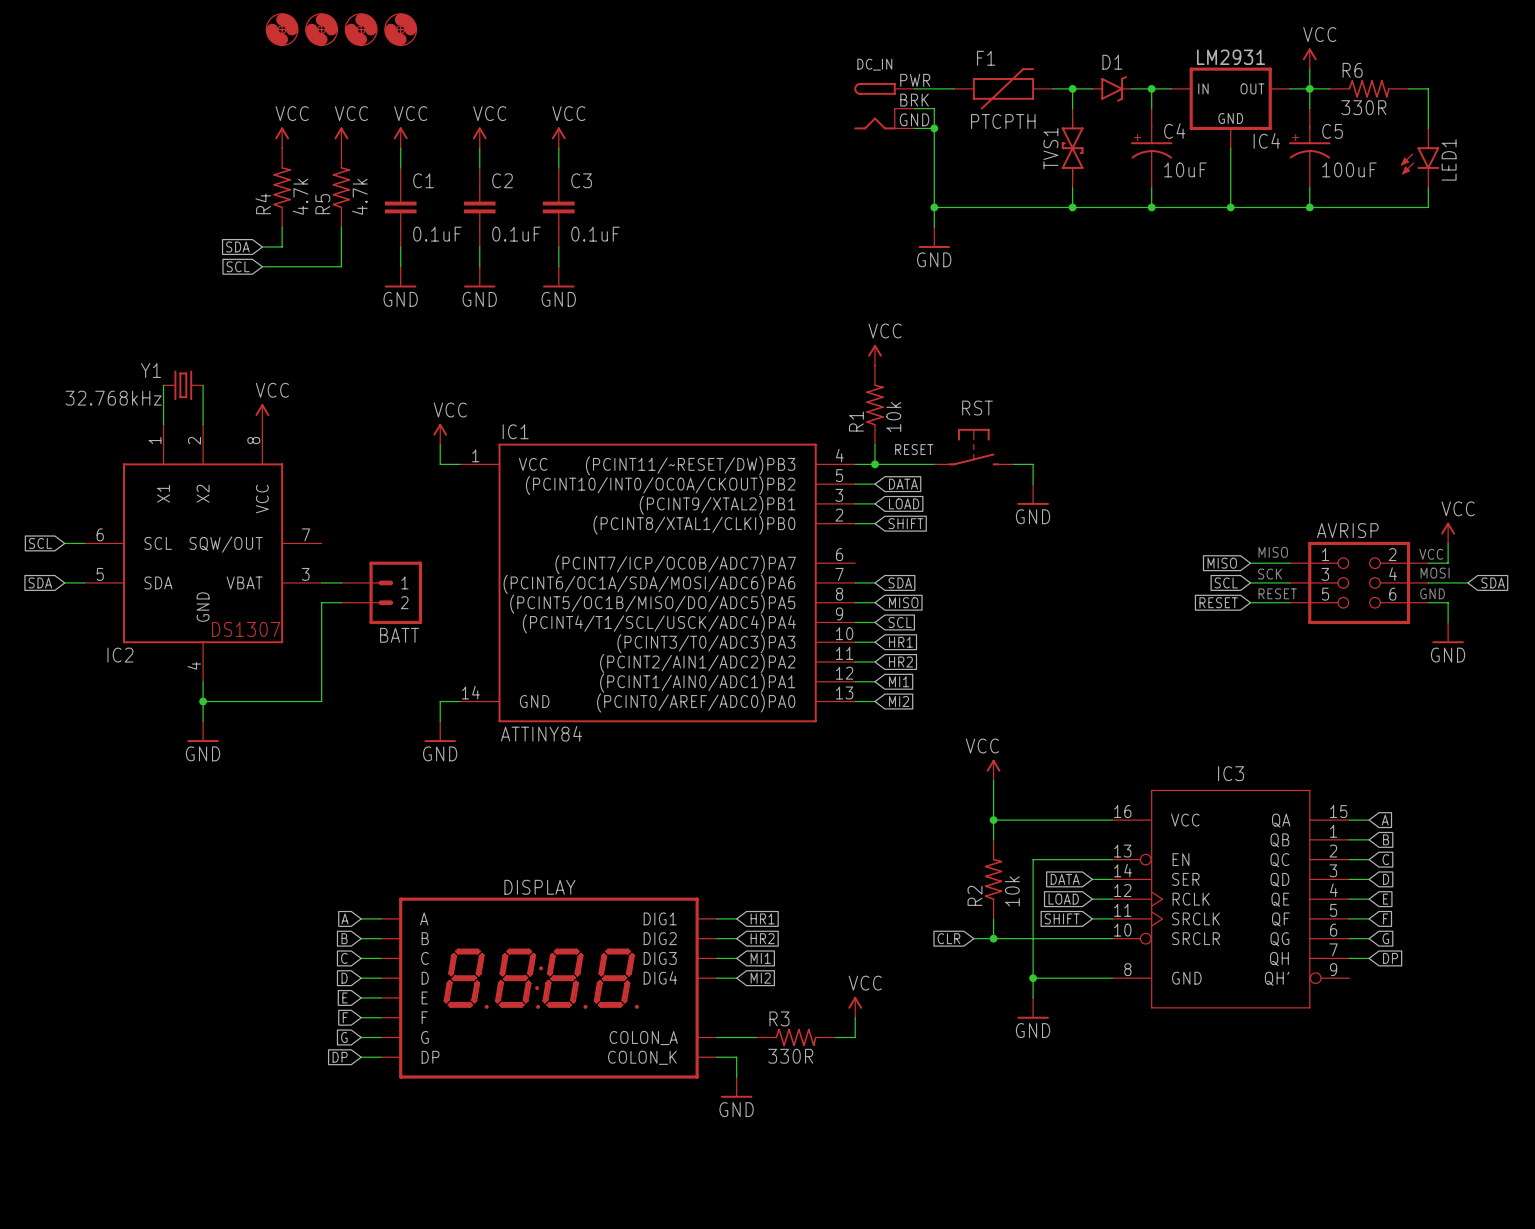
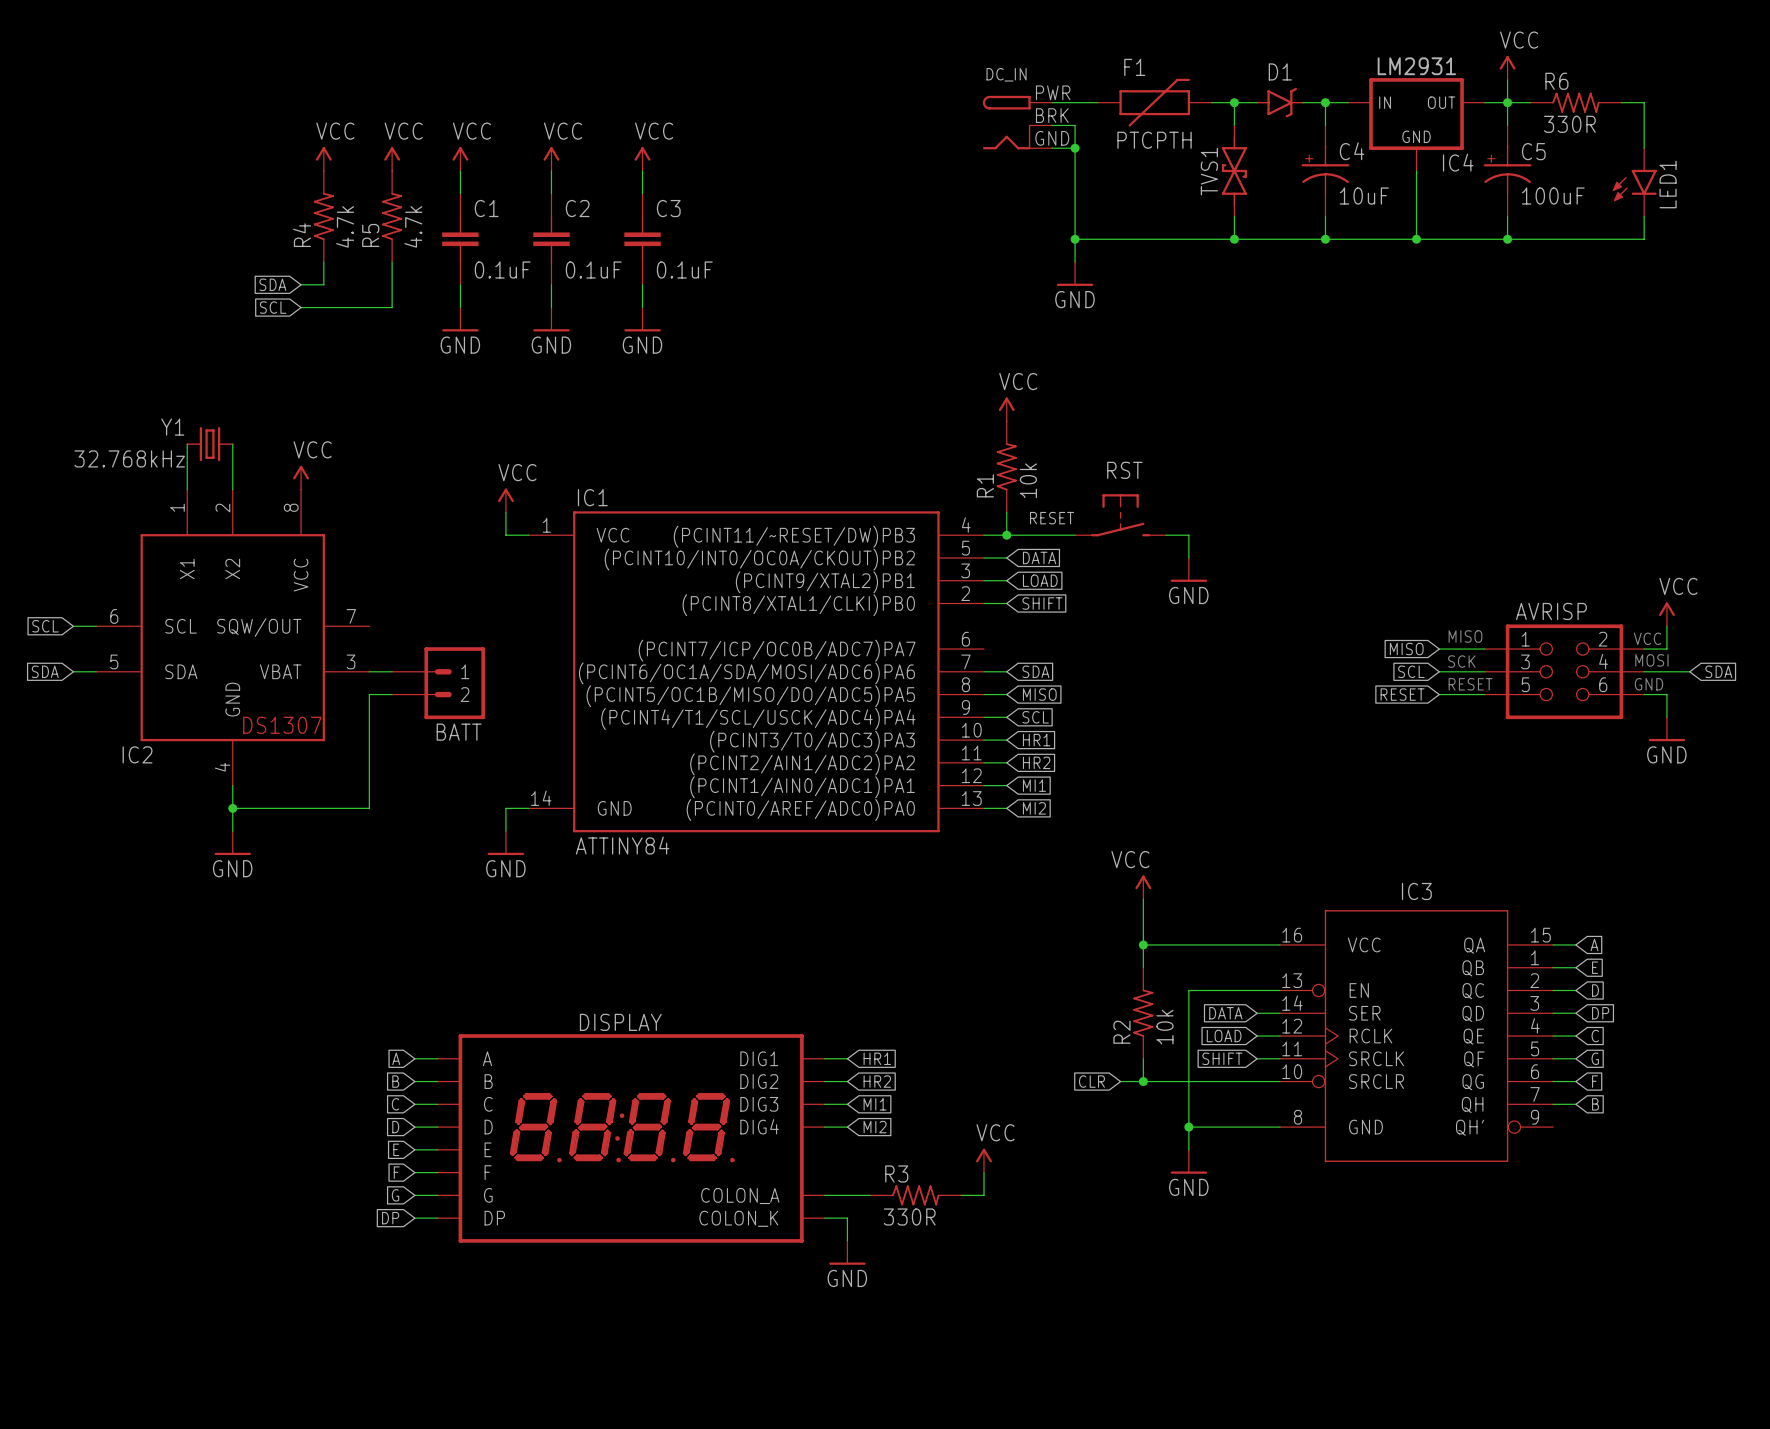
part: (282, 29) -> none
part: (321, 29) -> none
part: (361, 29) -> none
part: (400, 29) -> none
global label: B (1386, 839) -> E (1595, 967)
global label: C (1385, 859) -> D (1595, 990)
global label: D (1386, 879) -> DP (1600, 1013)
global label: E (1385, 899) -> C (1595, 1036)
global label: F (1385, 918) -> G (1595, 1058)
global label: G (1385, 938) -> F (1595, 1081)
global label: DP (1390, 958) -> B (1595, 1104)

